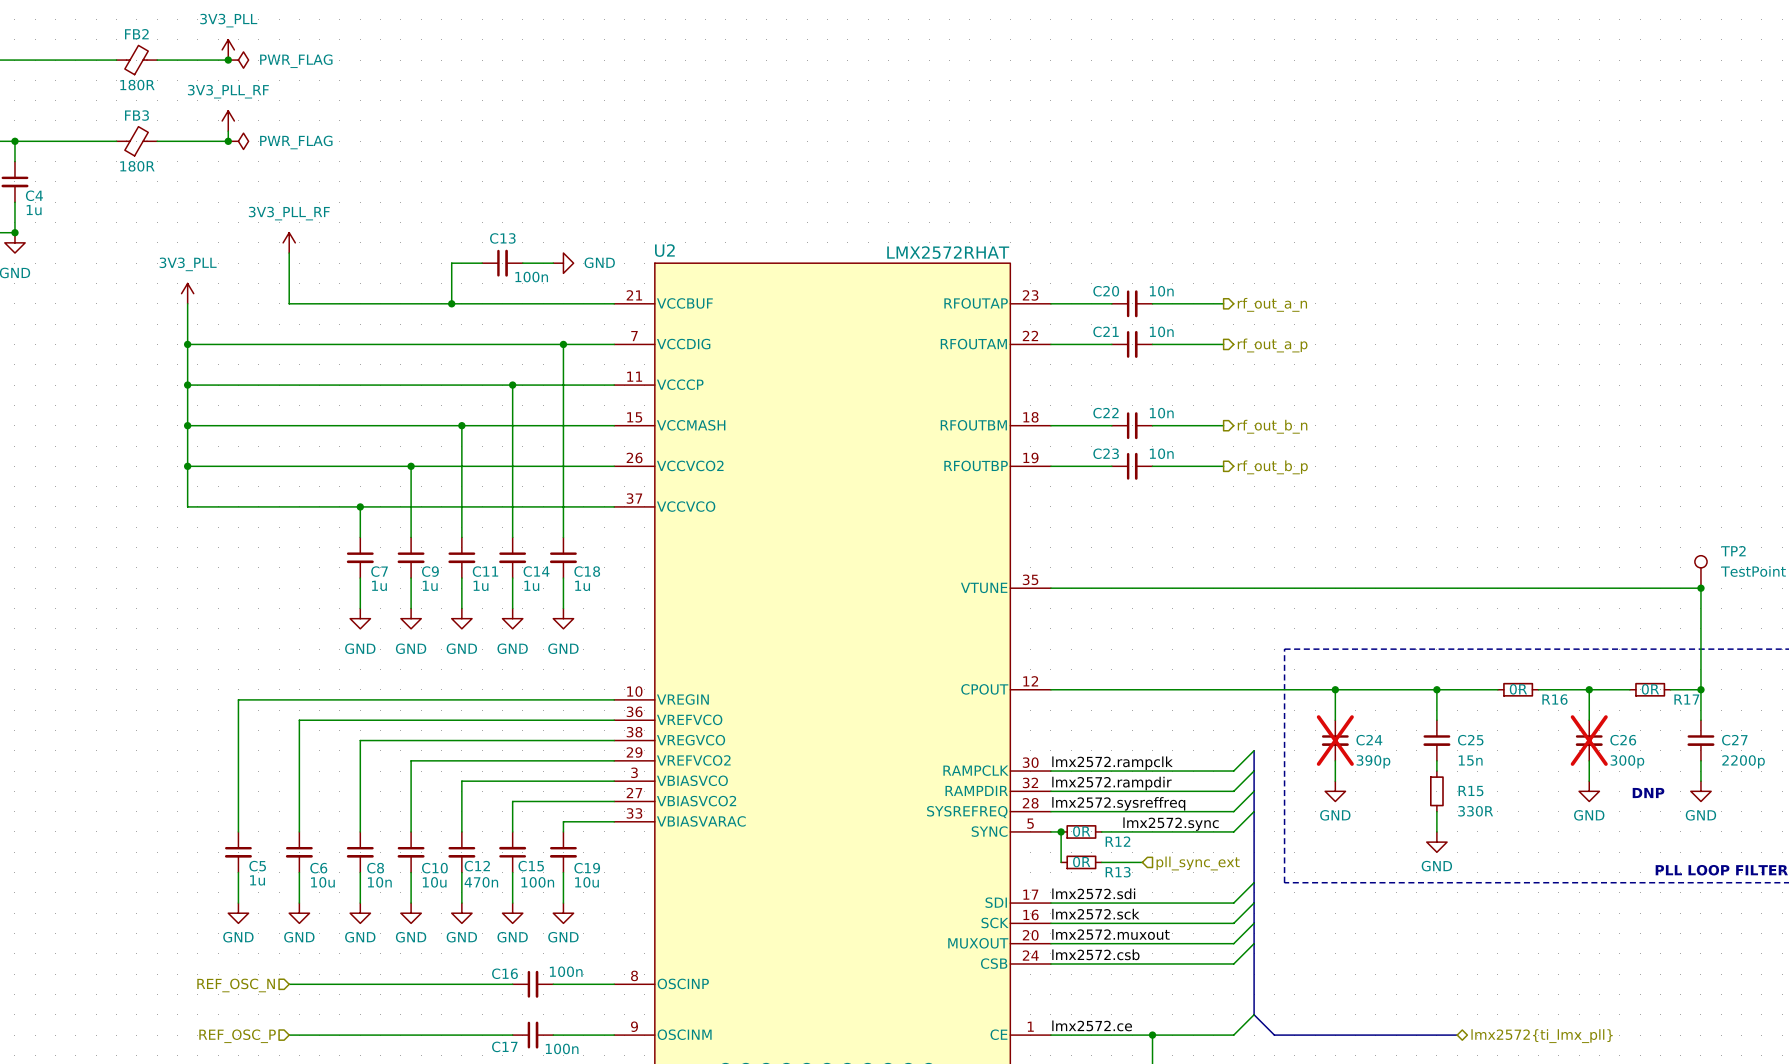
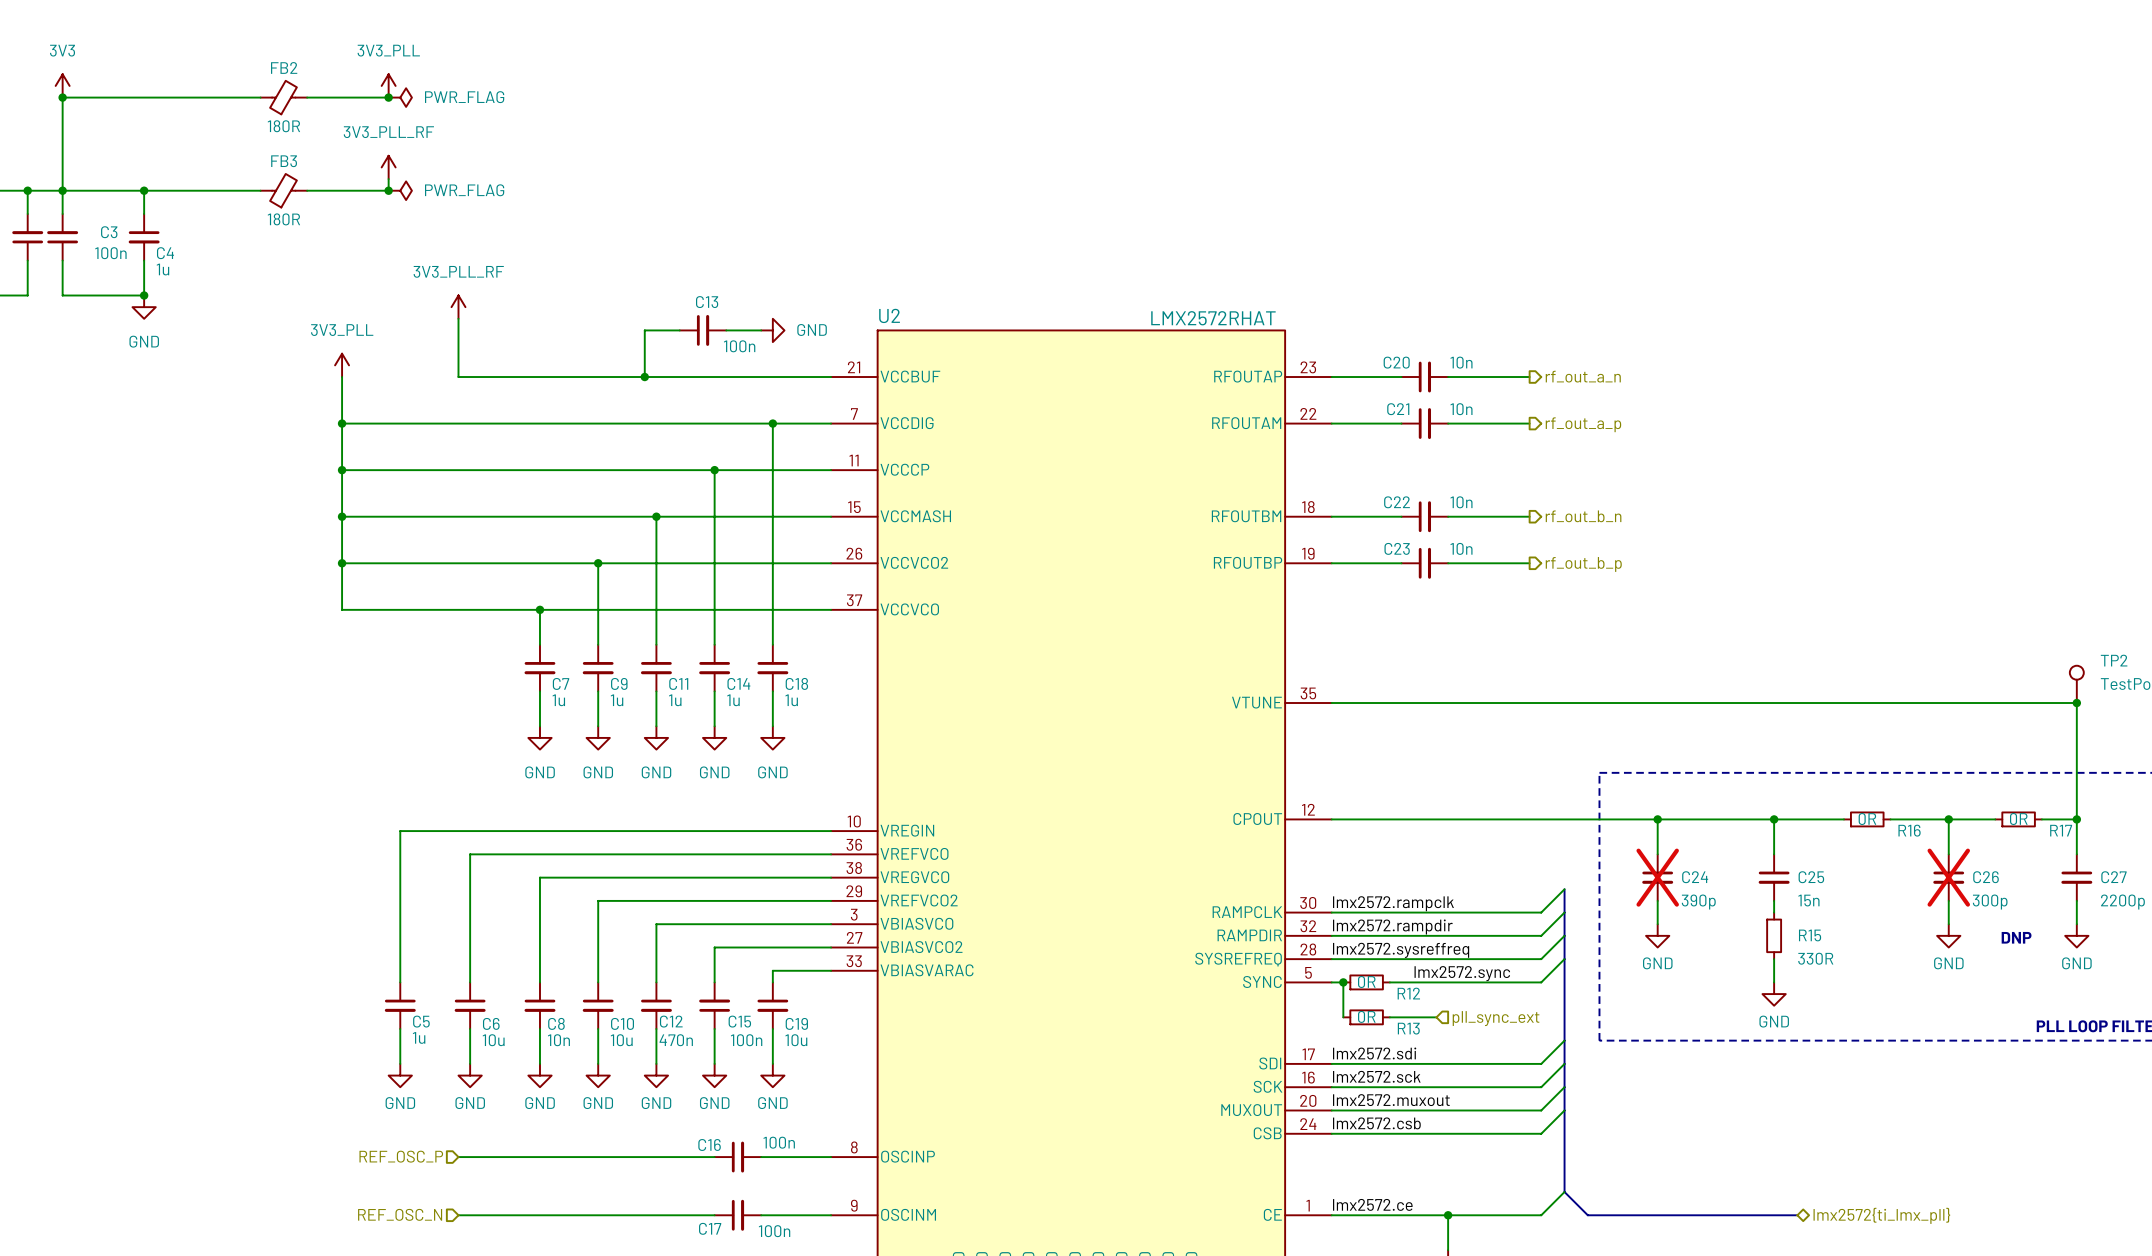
hierarchical label: REF_OSC_N (236, 985) -> REF_OSC_P (401, 1156)
hierarchical label: REF_OSC_P (237, 1036) -> REF_OSC_N (400, 1214)

